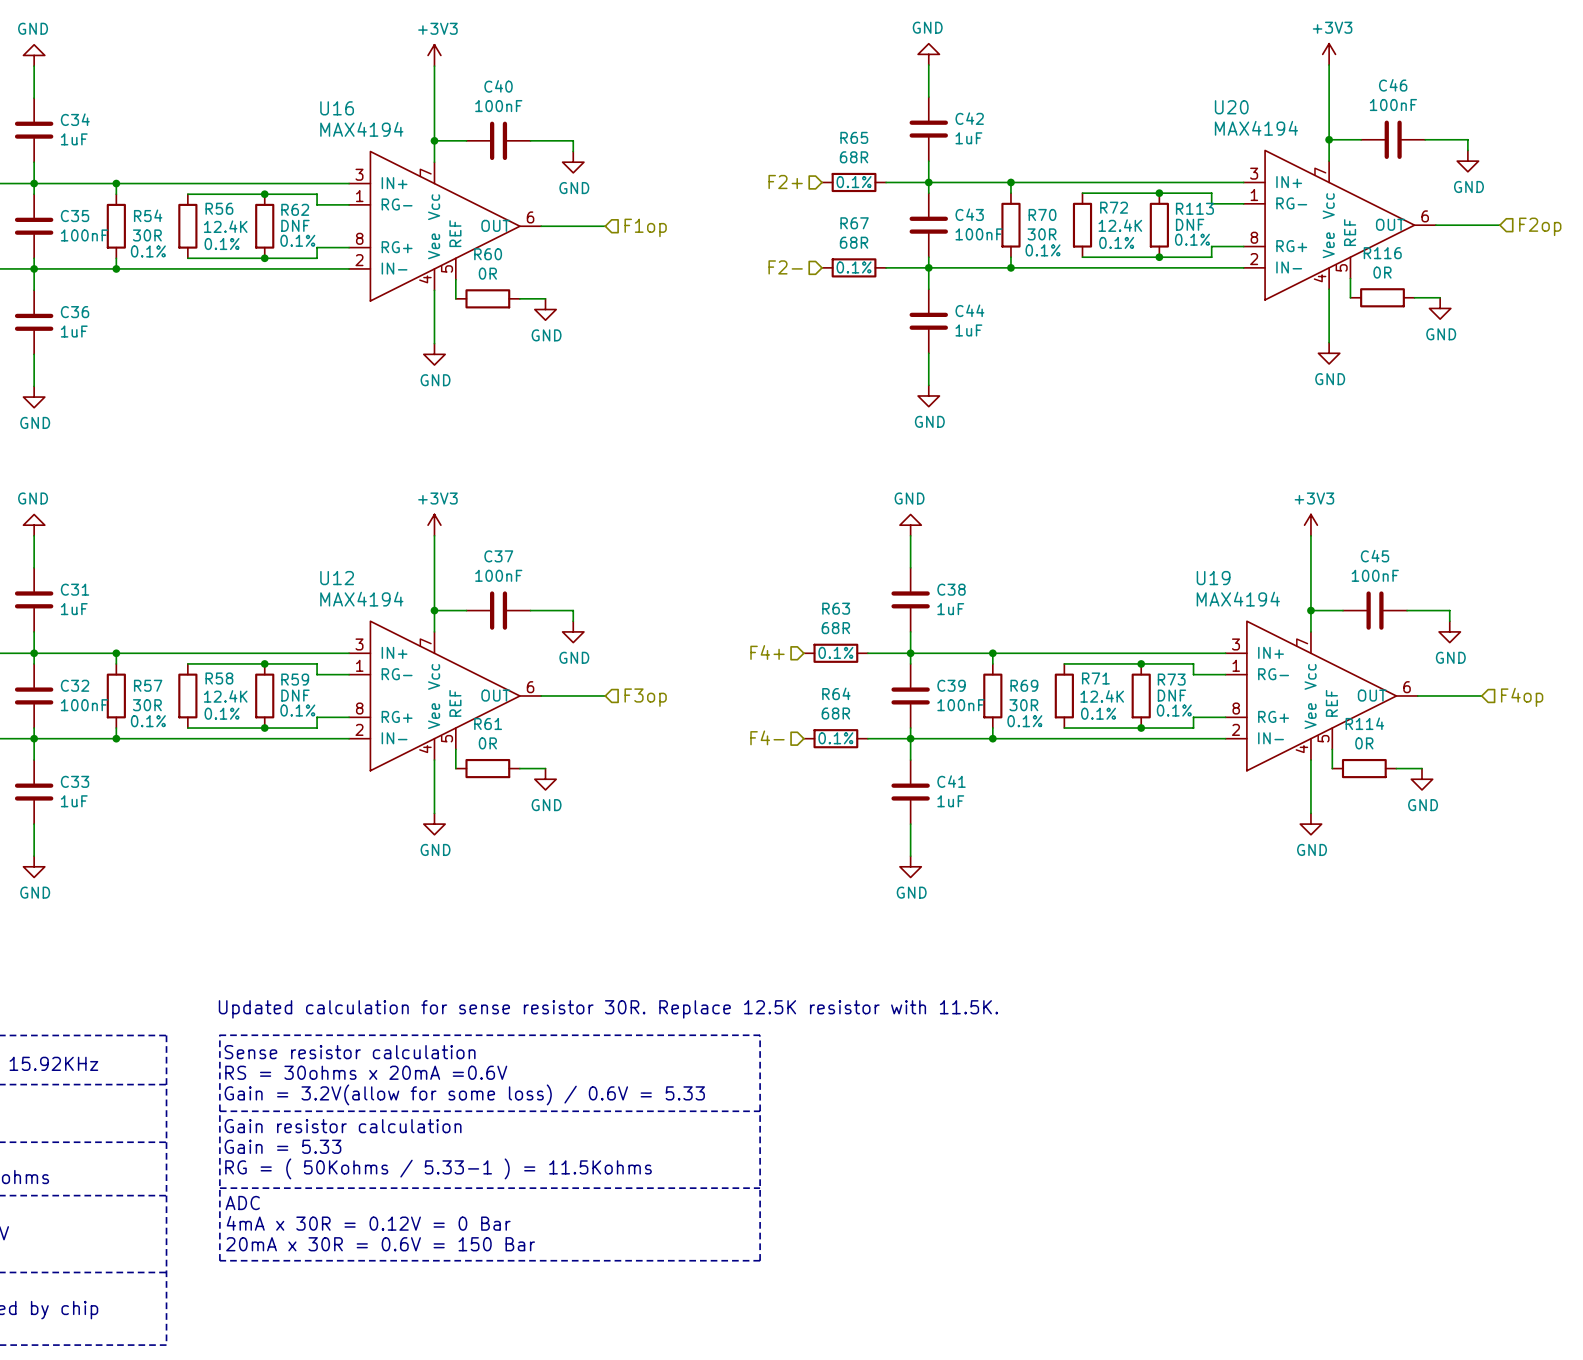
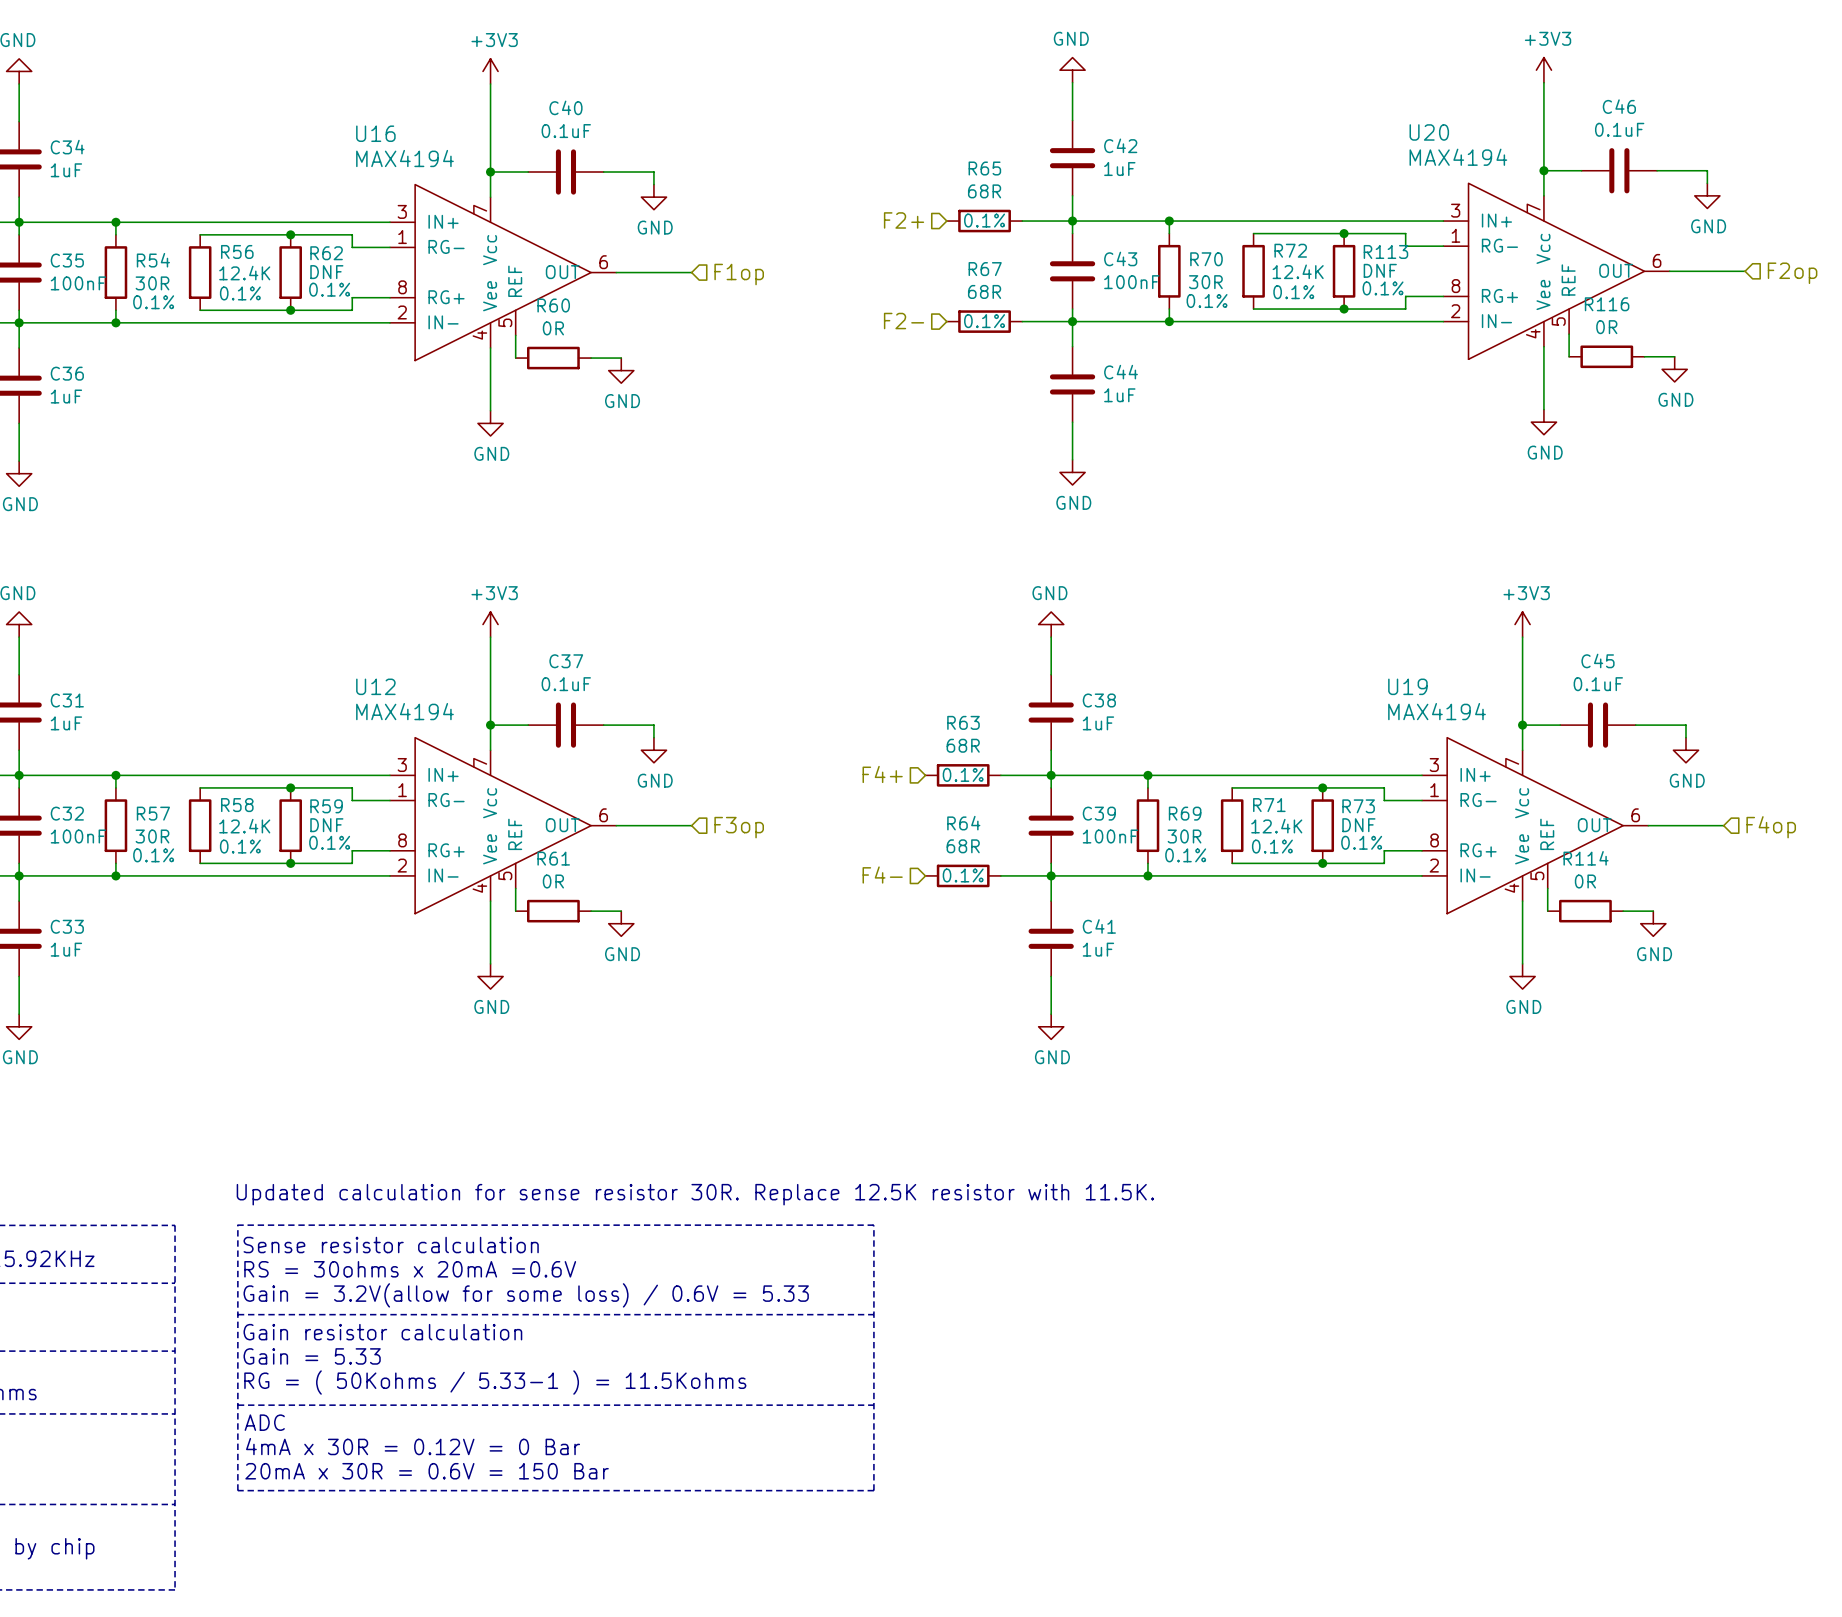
C46 value: 100nF (1393, 105) -> 0.1uF (1619, 129)
C40 value: 100nF (498, 106) -> 0.1uF (566, 131)
C37 value: 100nF (498, 575) -> 0.1uF (566, 684)
C45 value: 100nF (1375, 575) -> 0.1uF (1598, 684)

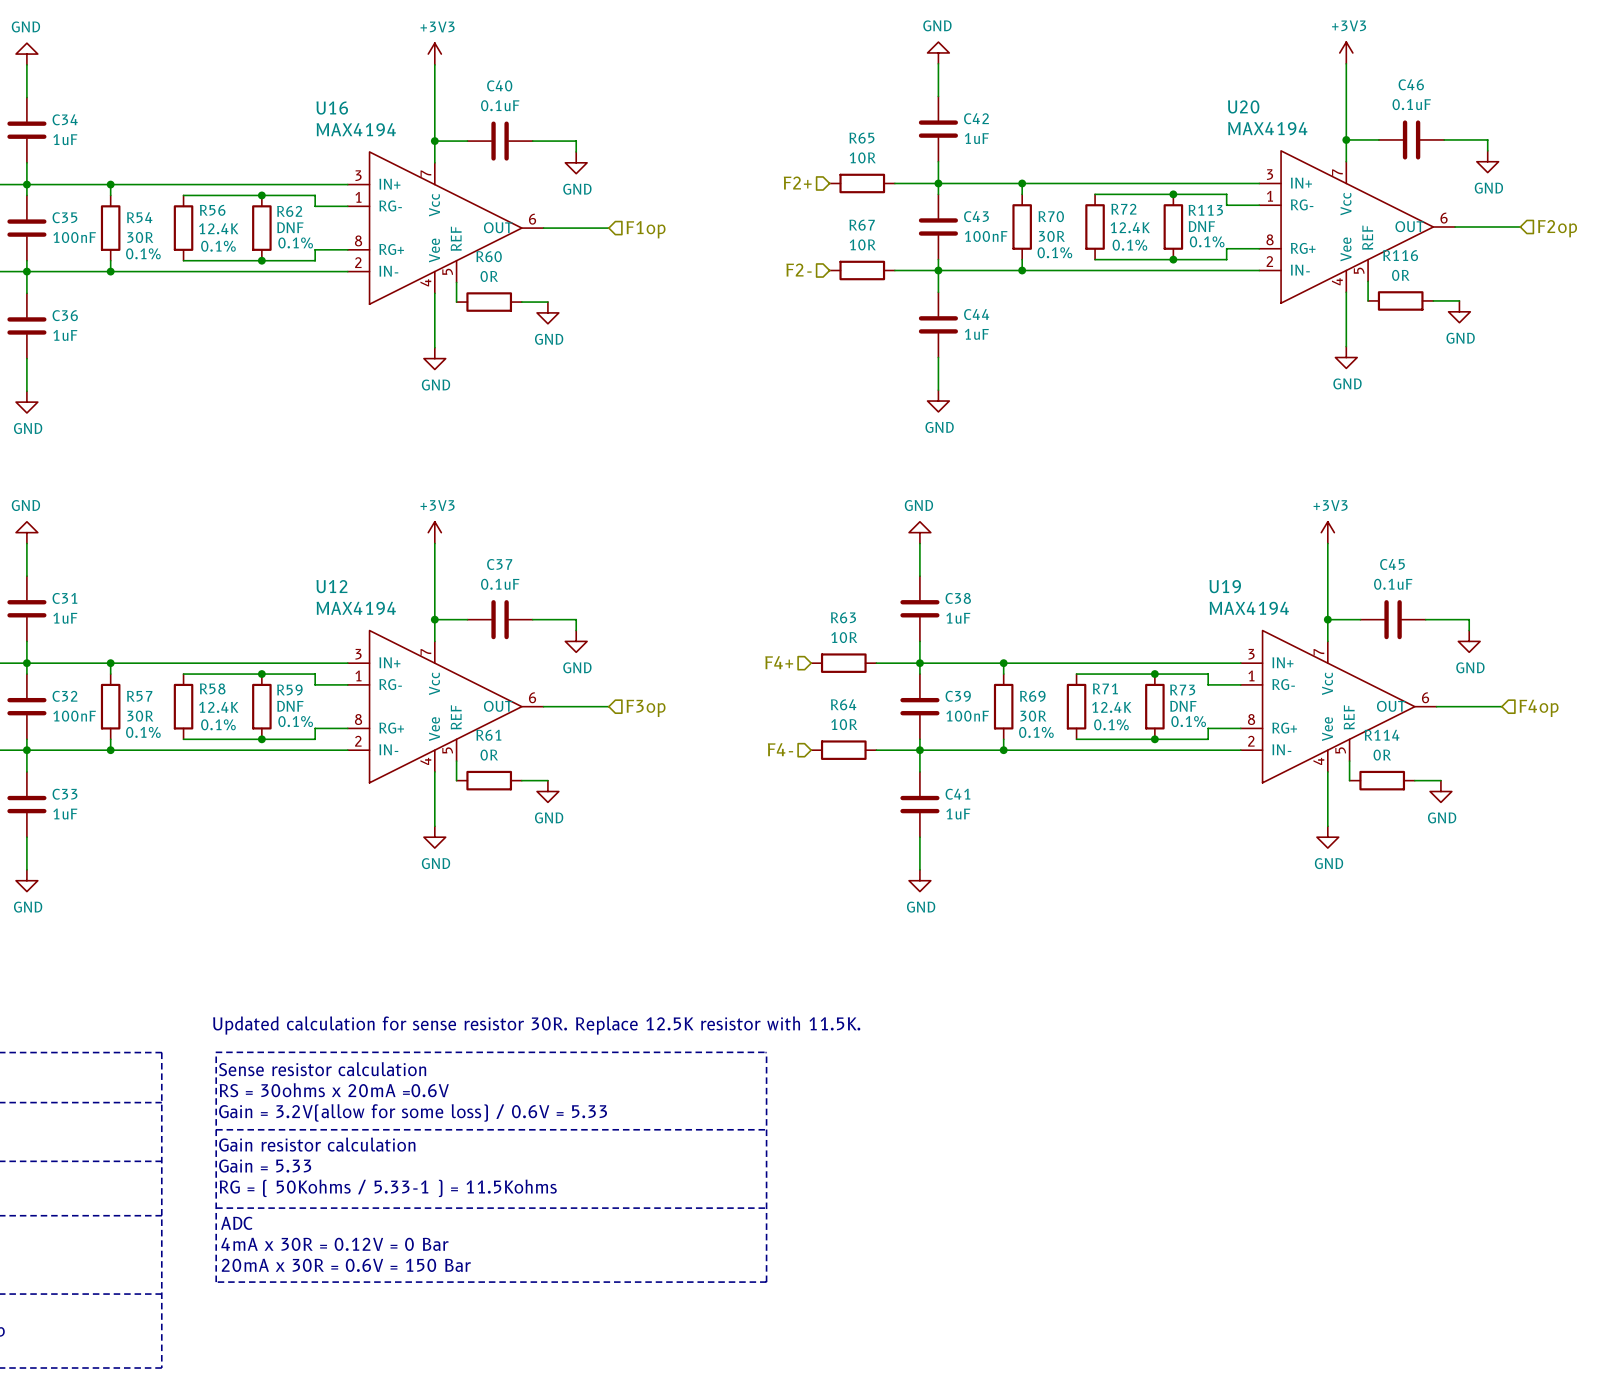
R65 value: 68R (984, 191) -> 10R (862, 157)
R65 text: 0.1% (984, 220) -> none
R67 value: 68R (984, 291) -> 10R (862, 244)
R67 text: 0.1% (984, 321) -> none
R63 value: 68R (963, 745) -> 10R (844, 637)
R63 text: 0.1% (963, 774) -> none
R64 value: 68R (963, 846) -> 10R (844, 724)
R64 text: 0.1% (963, 875) -> none

